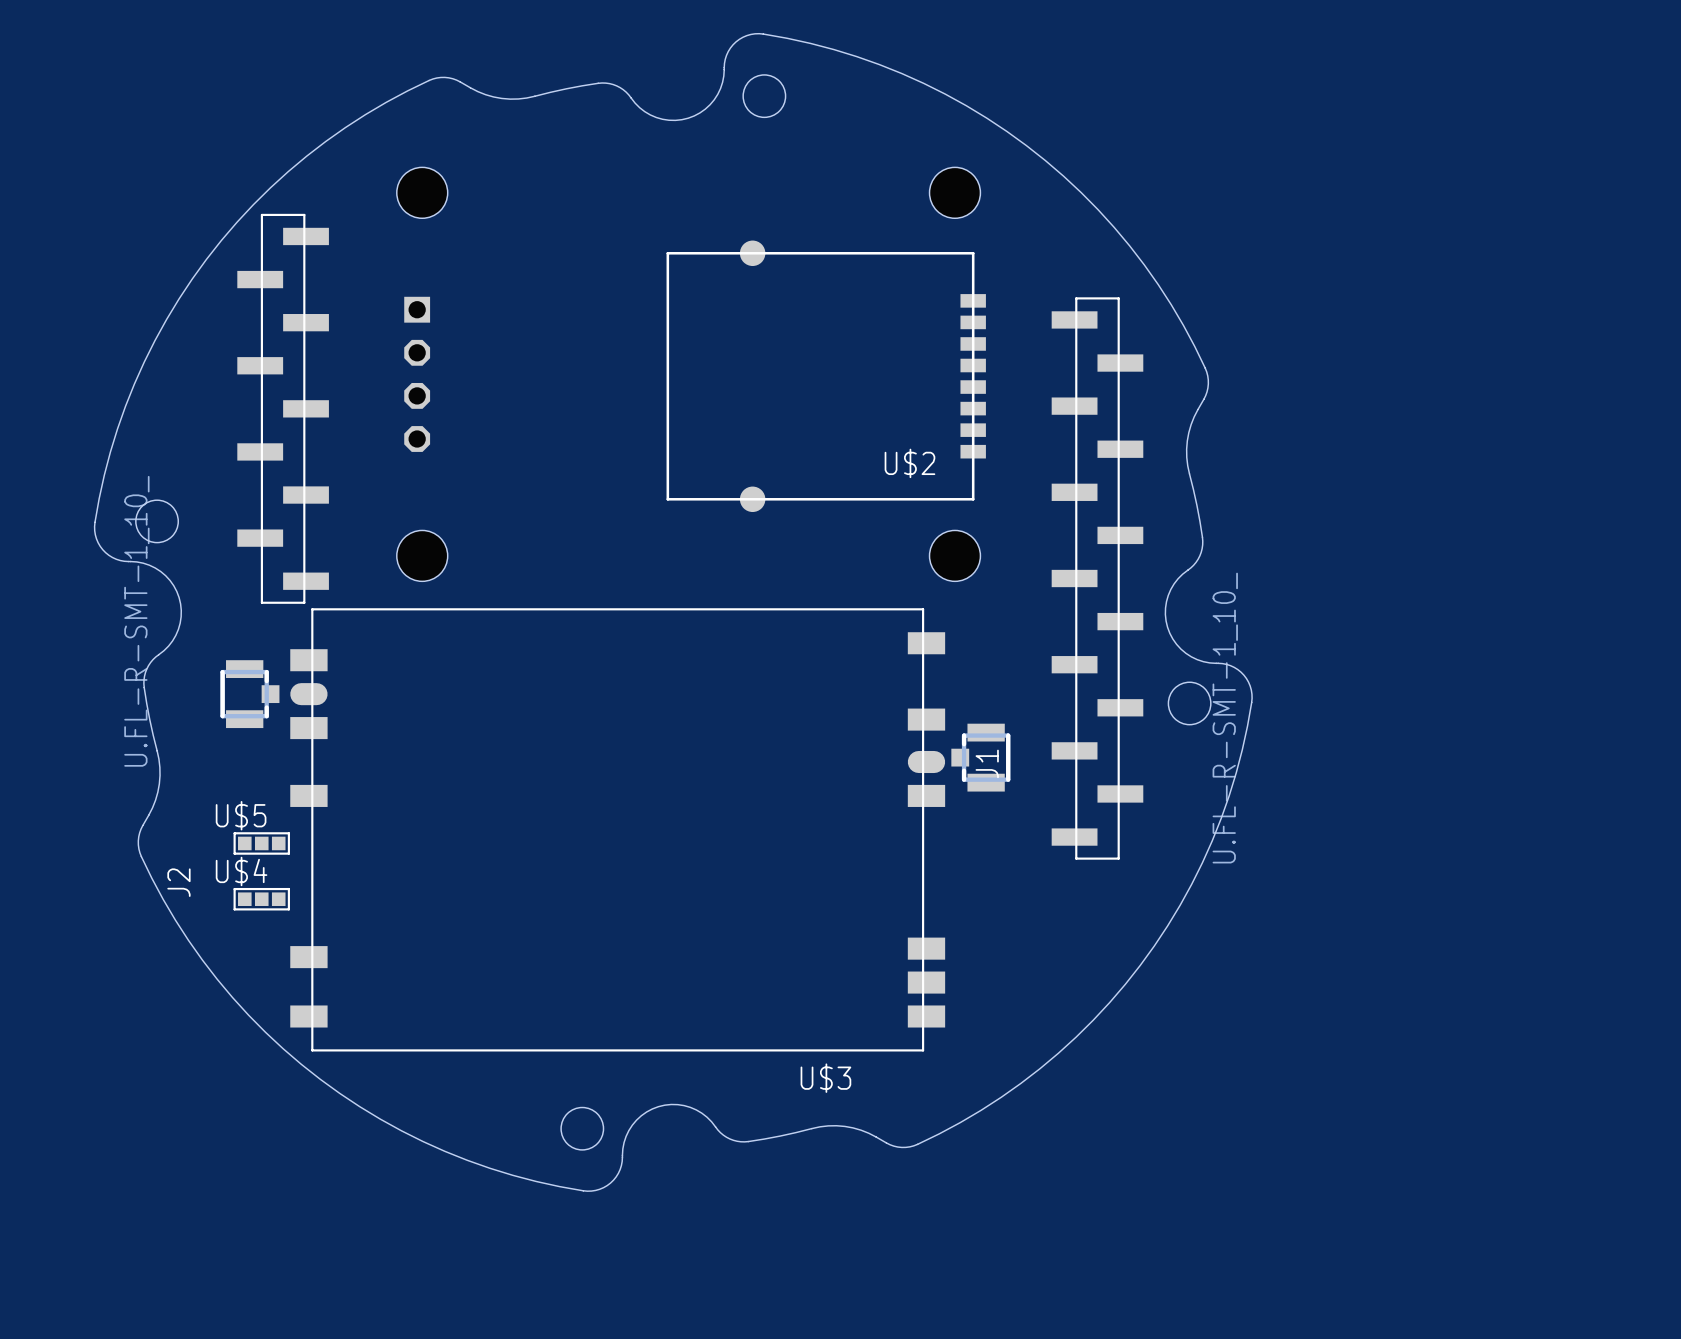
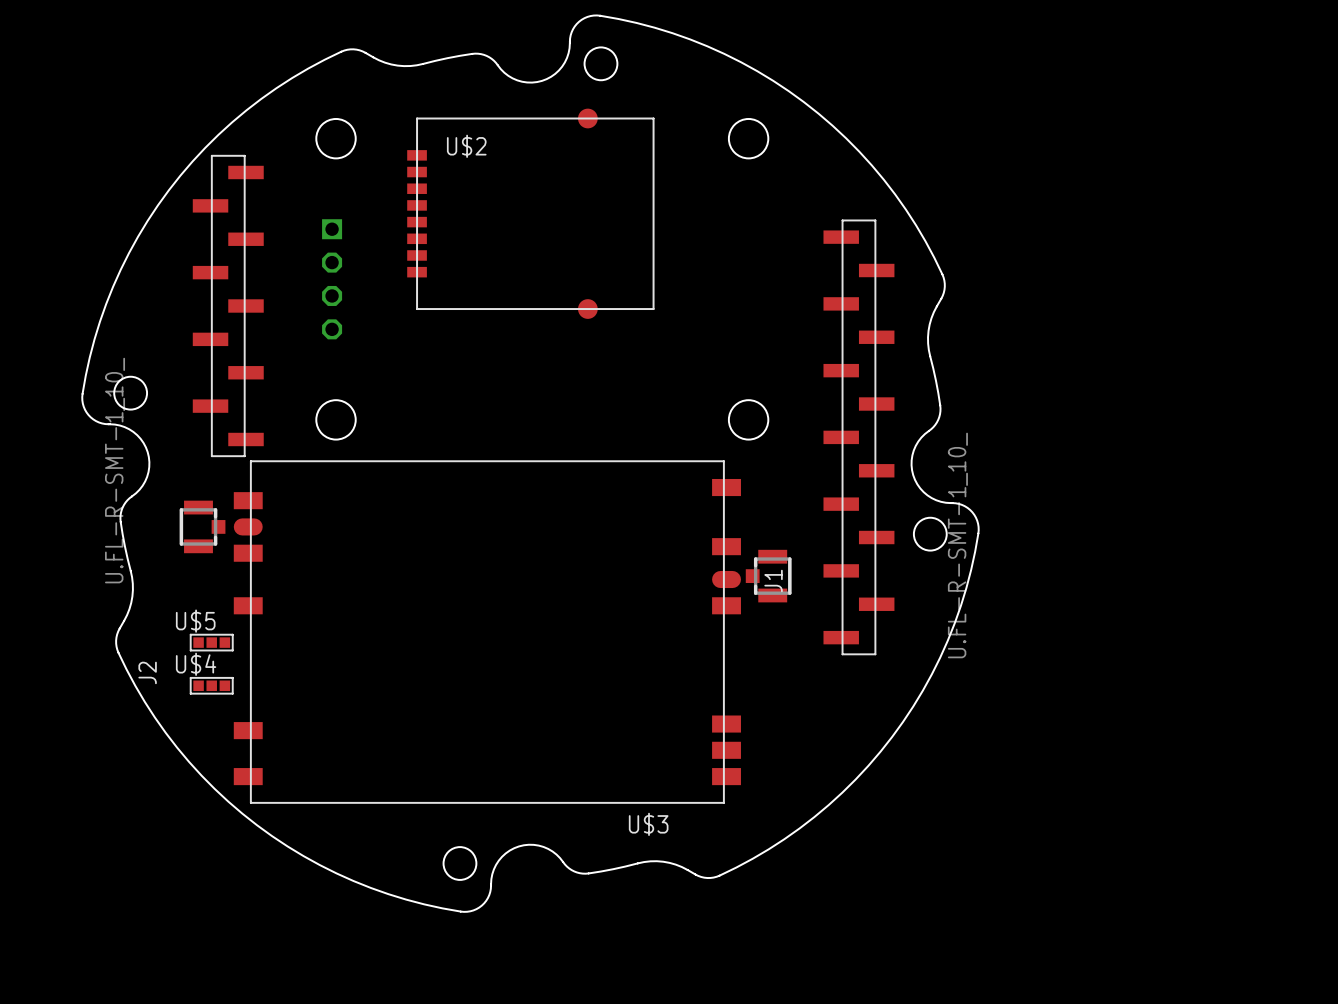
U$2 rotation: 0° (826, 376) -> 180° (530, 213)

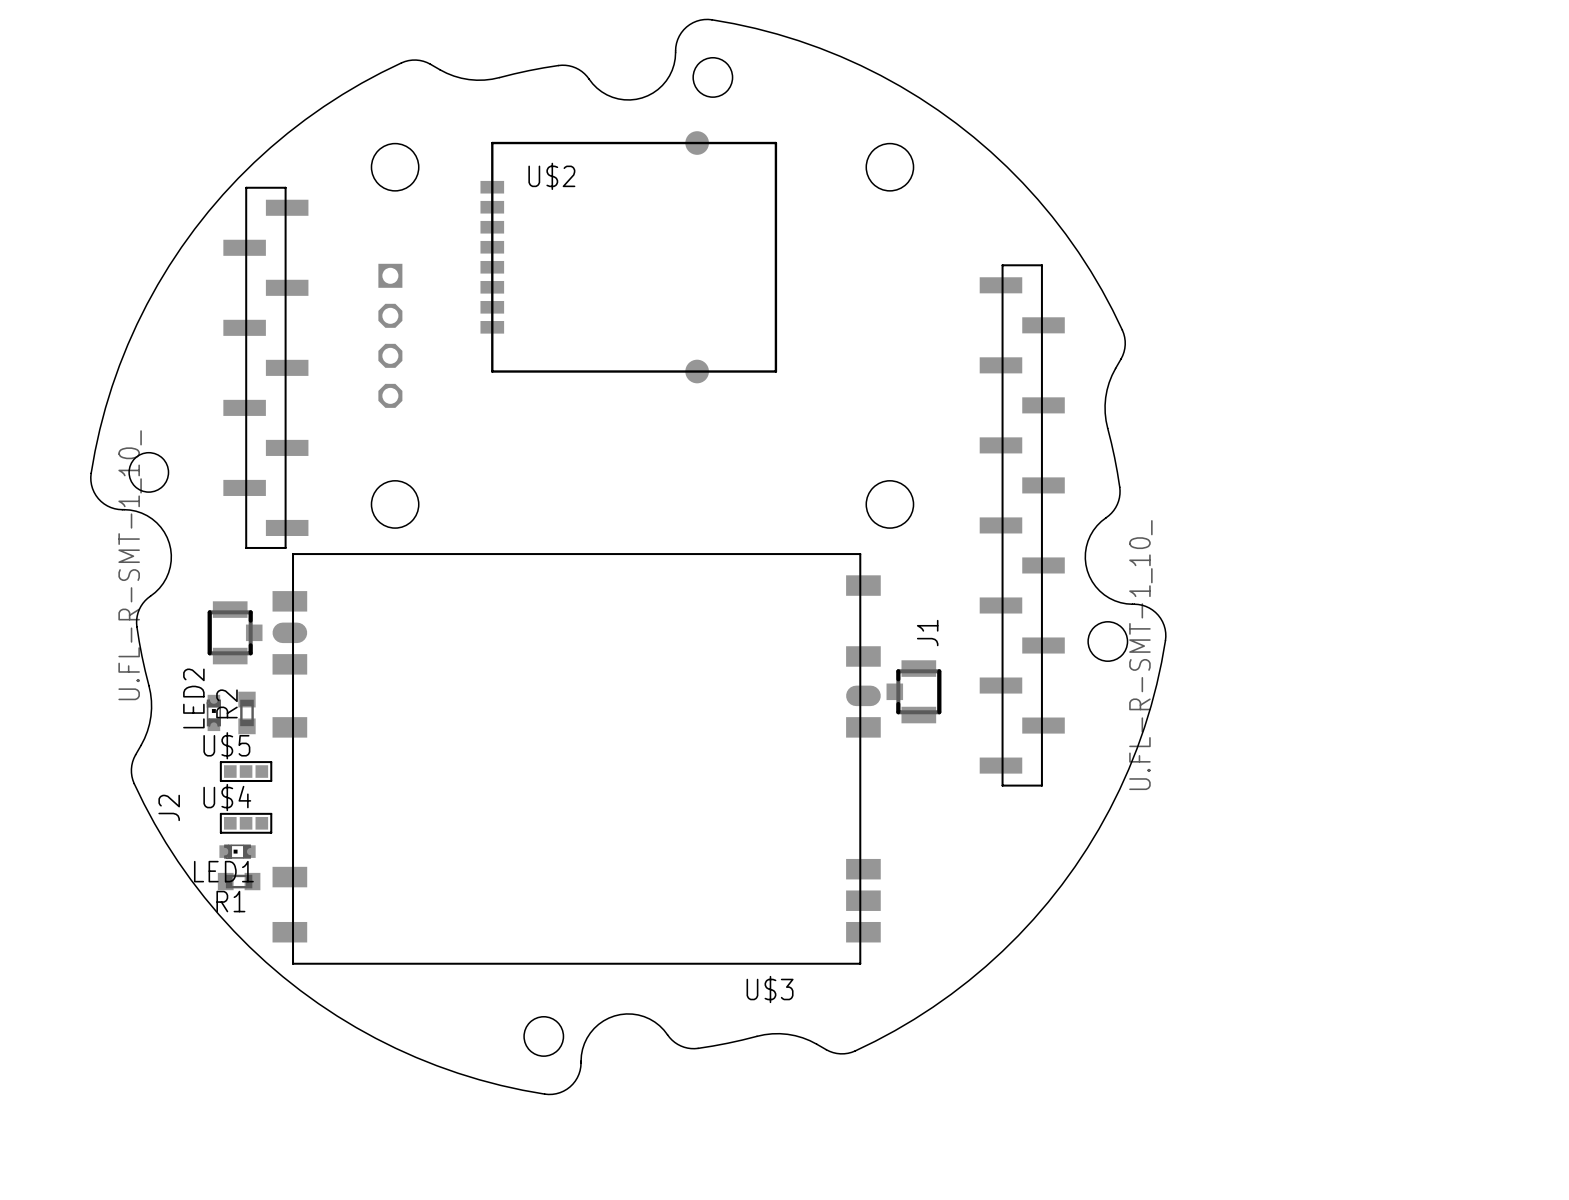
J1 name position: J1 (773, 580) -> J1 (927, 633)
LED2: none -> (213, 712)
R2: none -> (246, 712)
LED1: none -> (237, 851)
R1: none -> (239, 881)

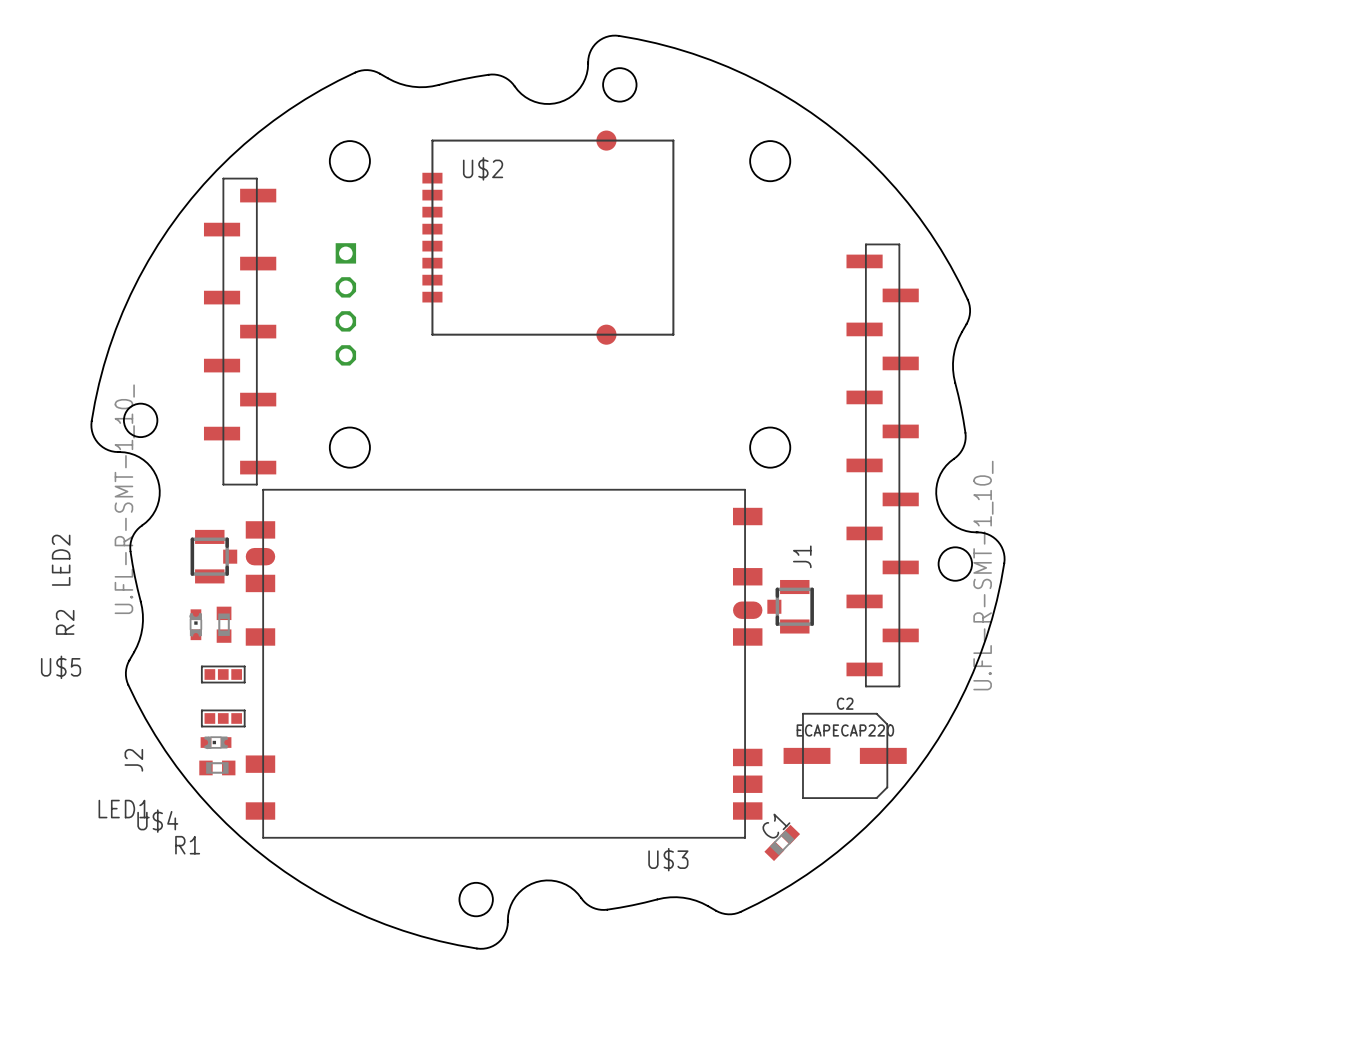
LED2 name position: LED2 (193, 698) -> LED2 (61, 560)
R2 name position: R2 (226, 703) -> R2 (65, 622)
U$5 name position: U$5 (226, 745) -> U$5 (61, 667)
U$4 name position: U$4 (227, 797) -> U$4 (157, 821)
J2 name position: J2 (169, 807) -> J2 (133, 760)
C2: none -> ECAPECAP220 (845, 755)
LED1 name position: LED1 (223, 871) -> LED1 (124, 809)
R1 name position: R1 (230, 901) -> R1 (187, 845)
C1: none -> (782, 842)

